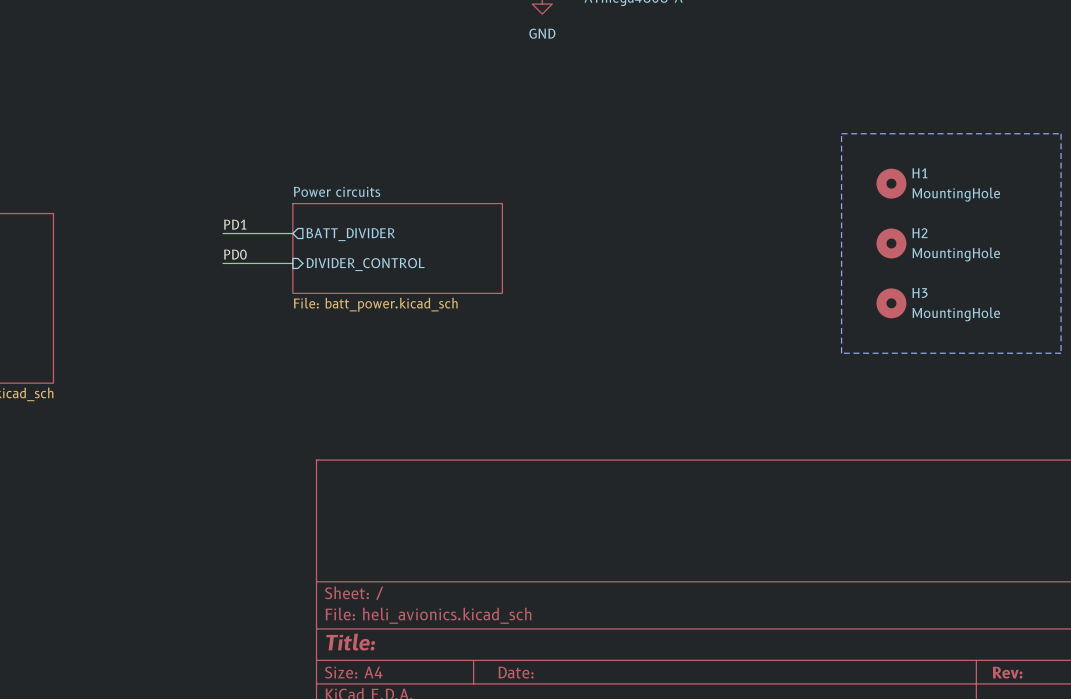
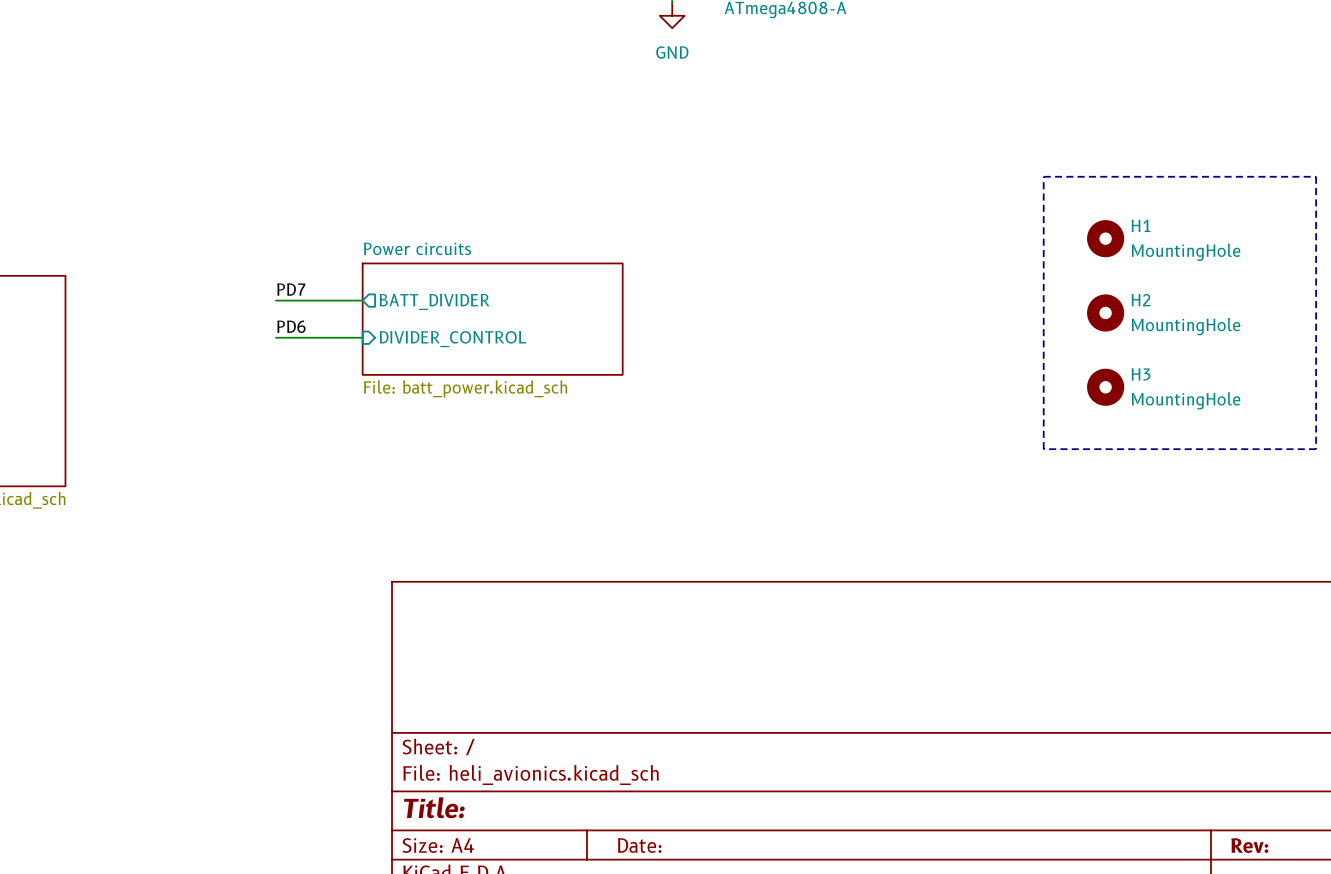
label: PD1 (235, 224) -> PD7 (291, 289)
label: PD0 (235, 254) -> PD6 (291, 326)

